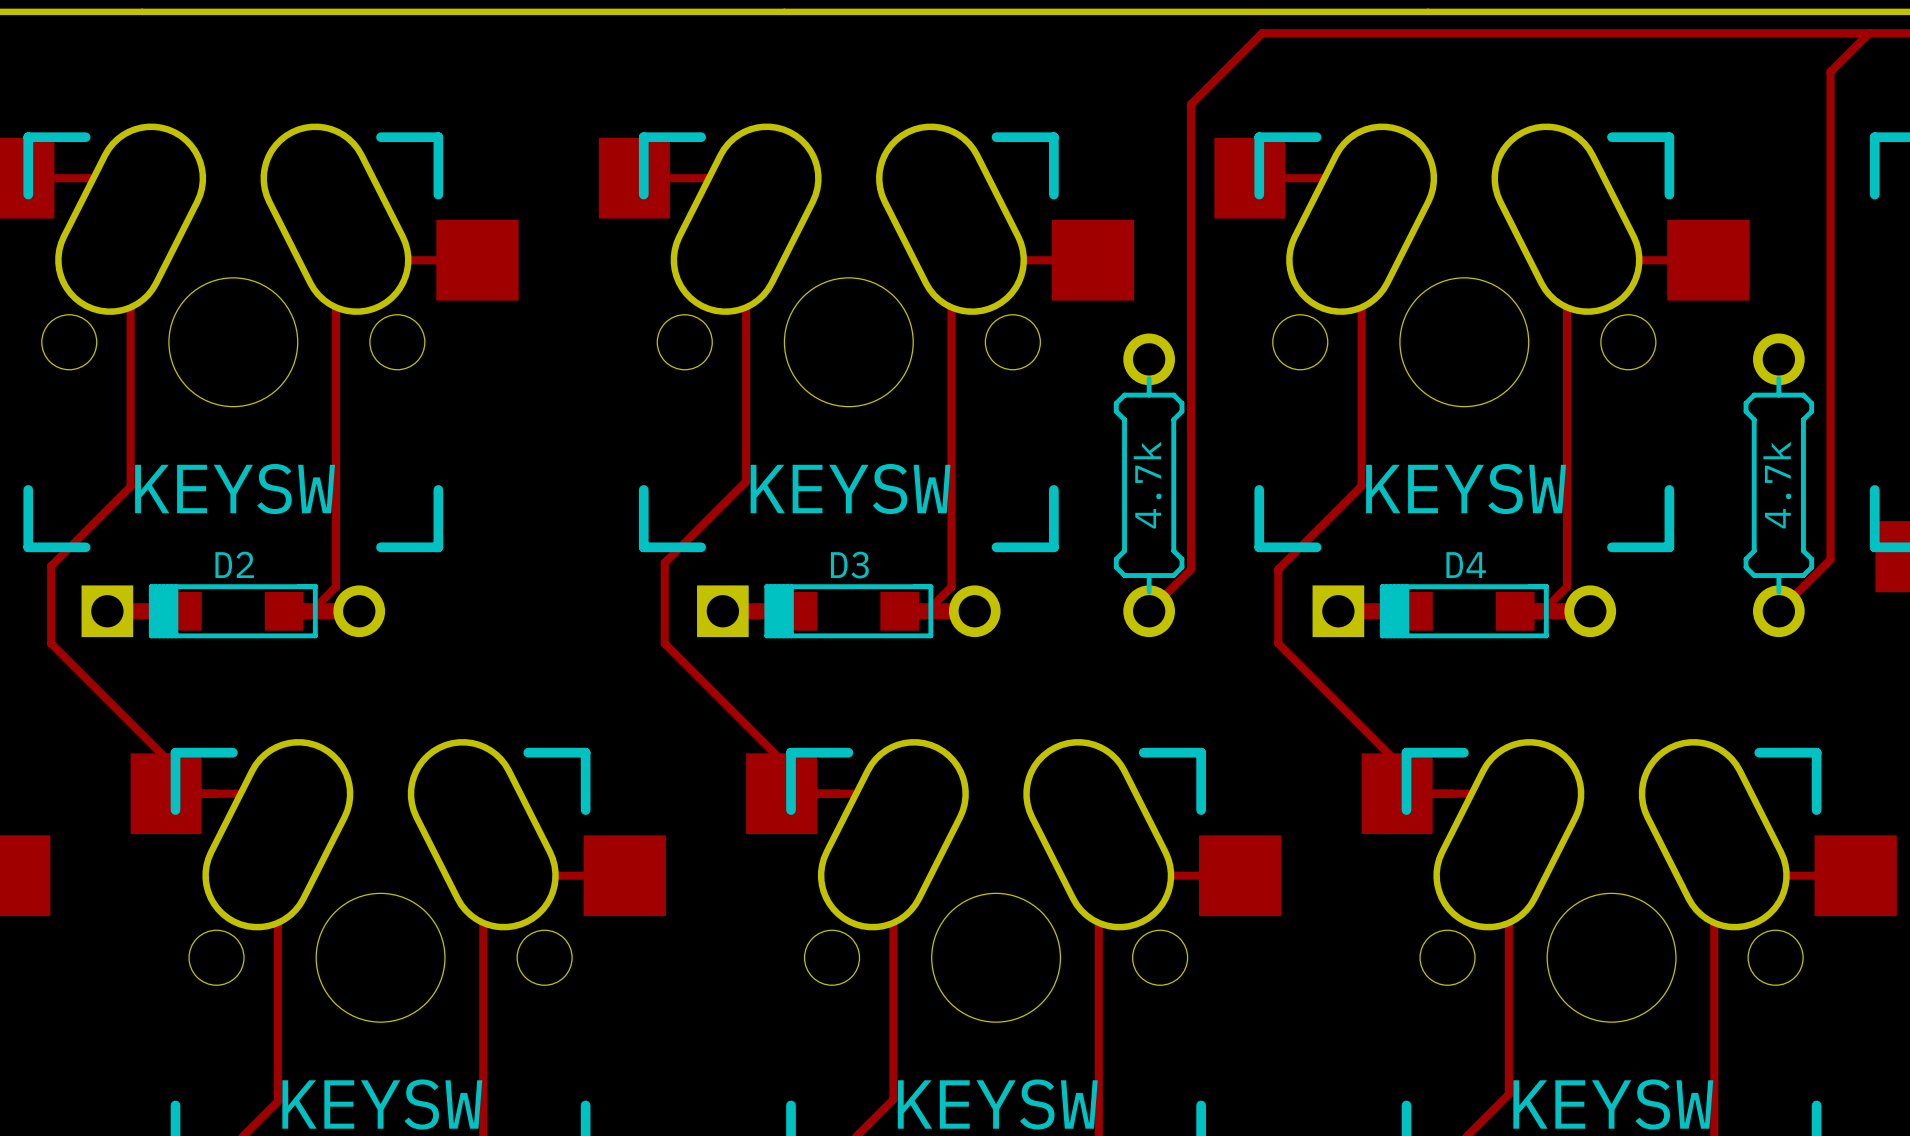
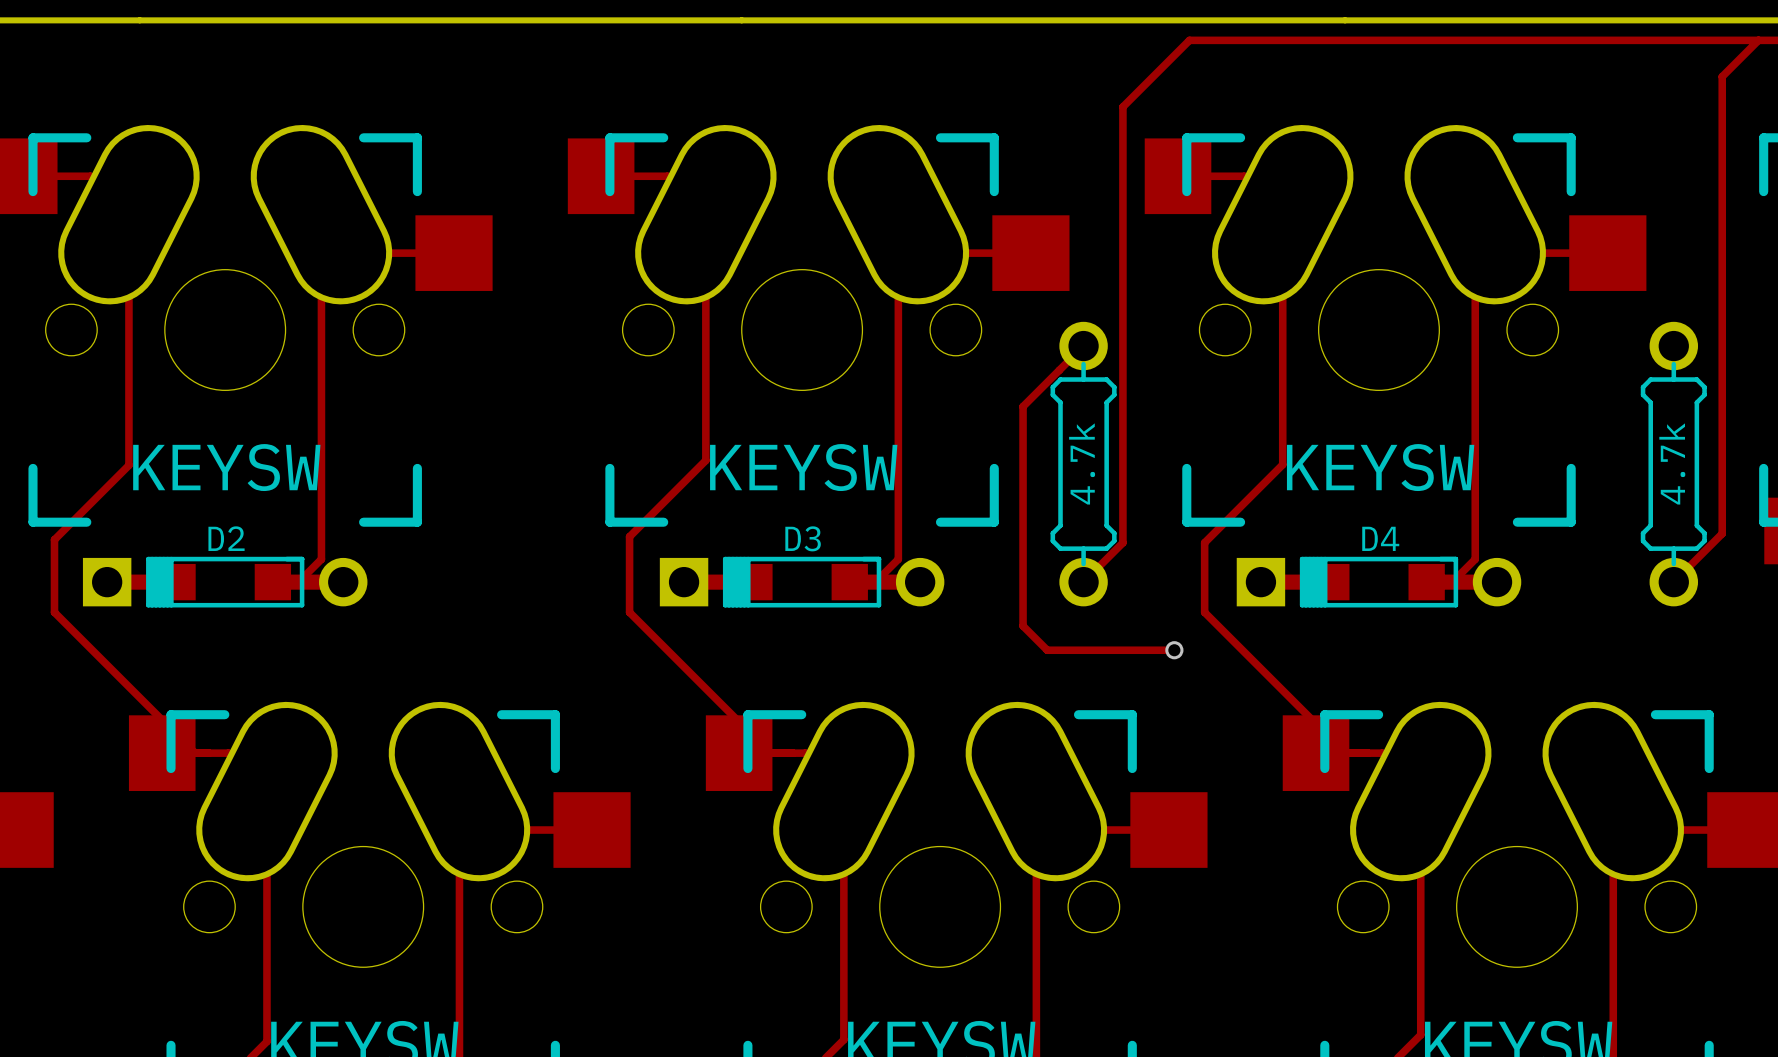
track: none -> (1083, 346) (1023, 406) (1023, 626) (1047, 650) (1174, 650)
via: none -> (1174, 650)

